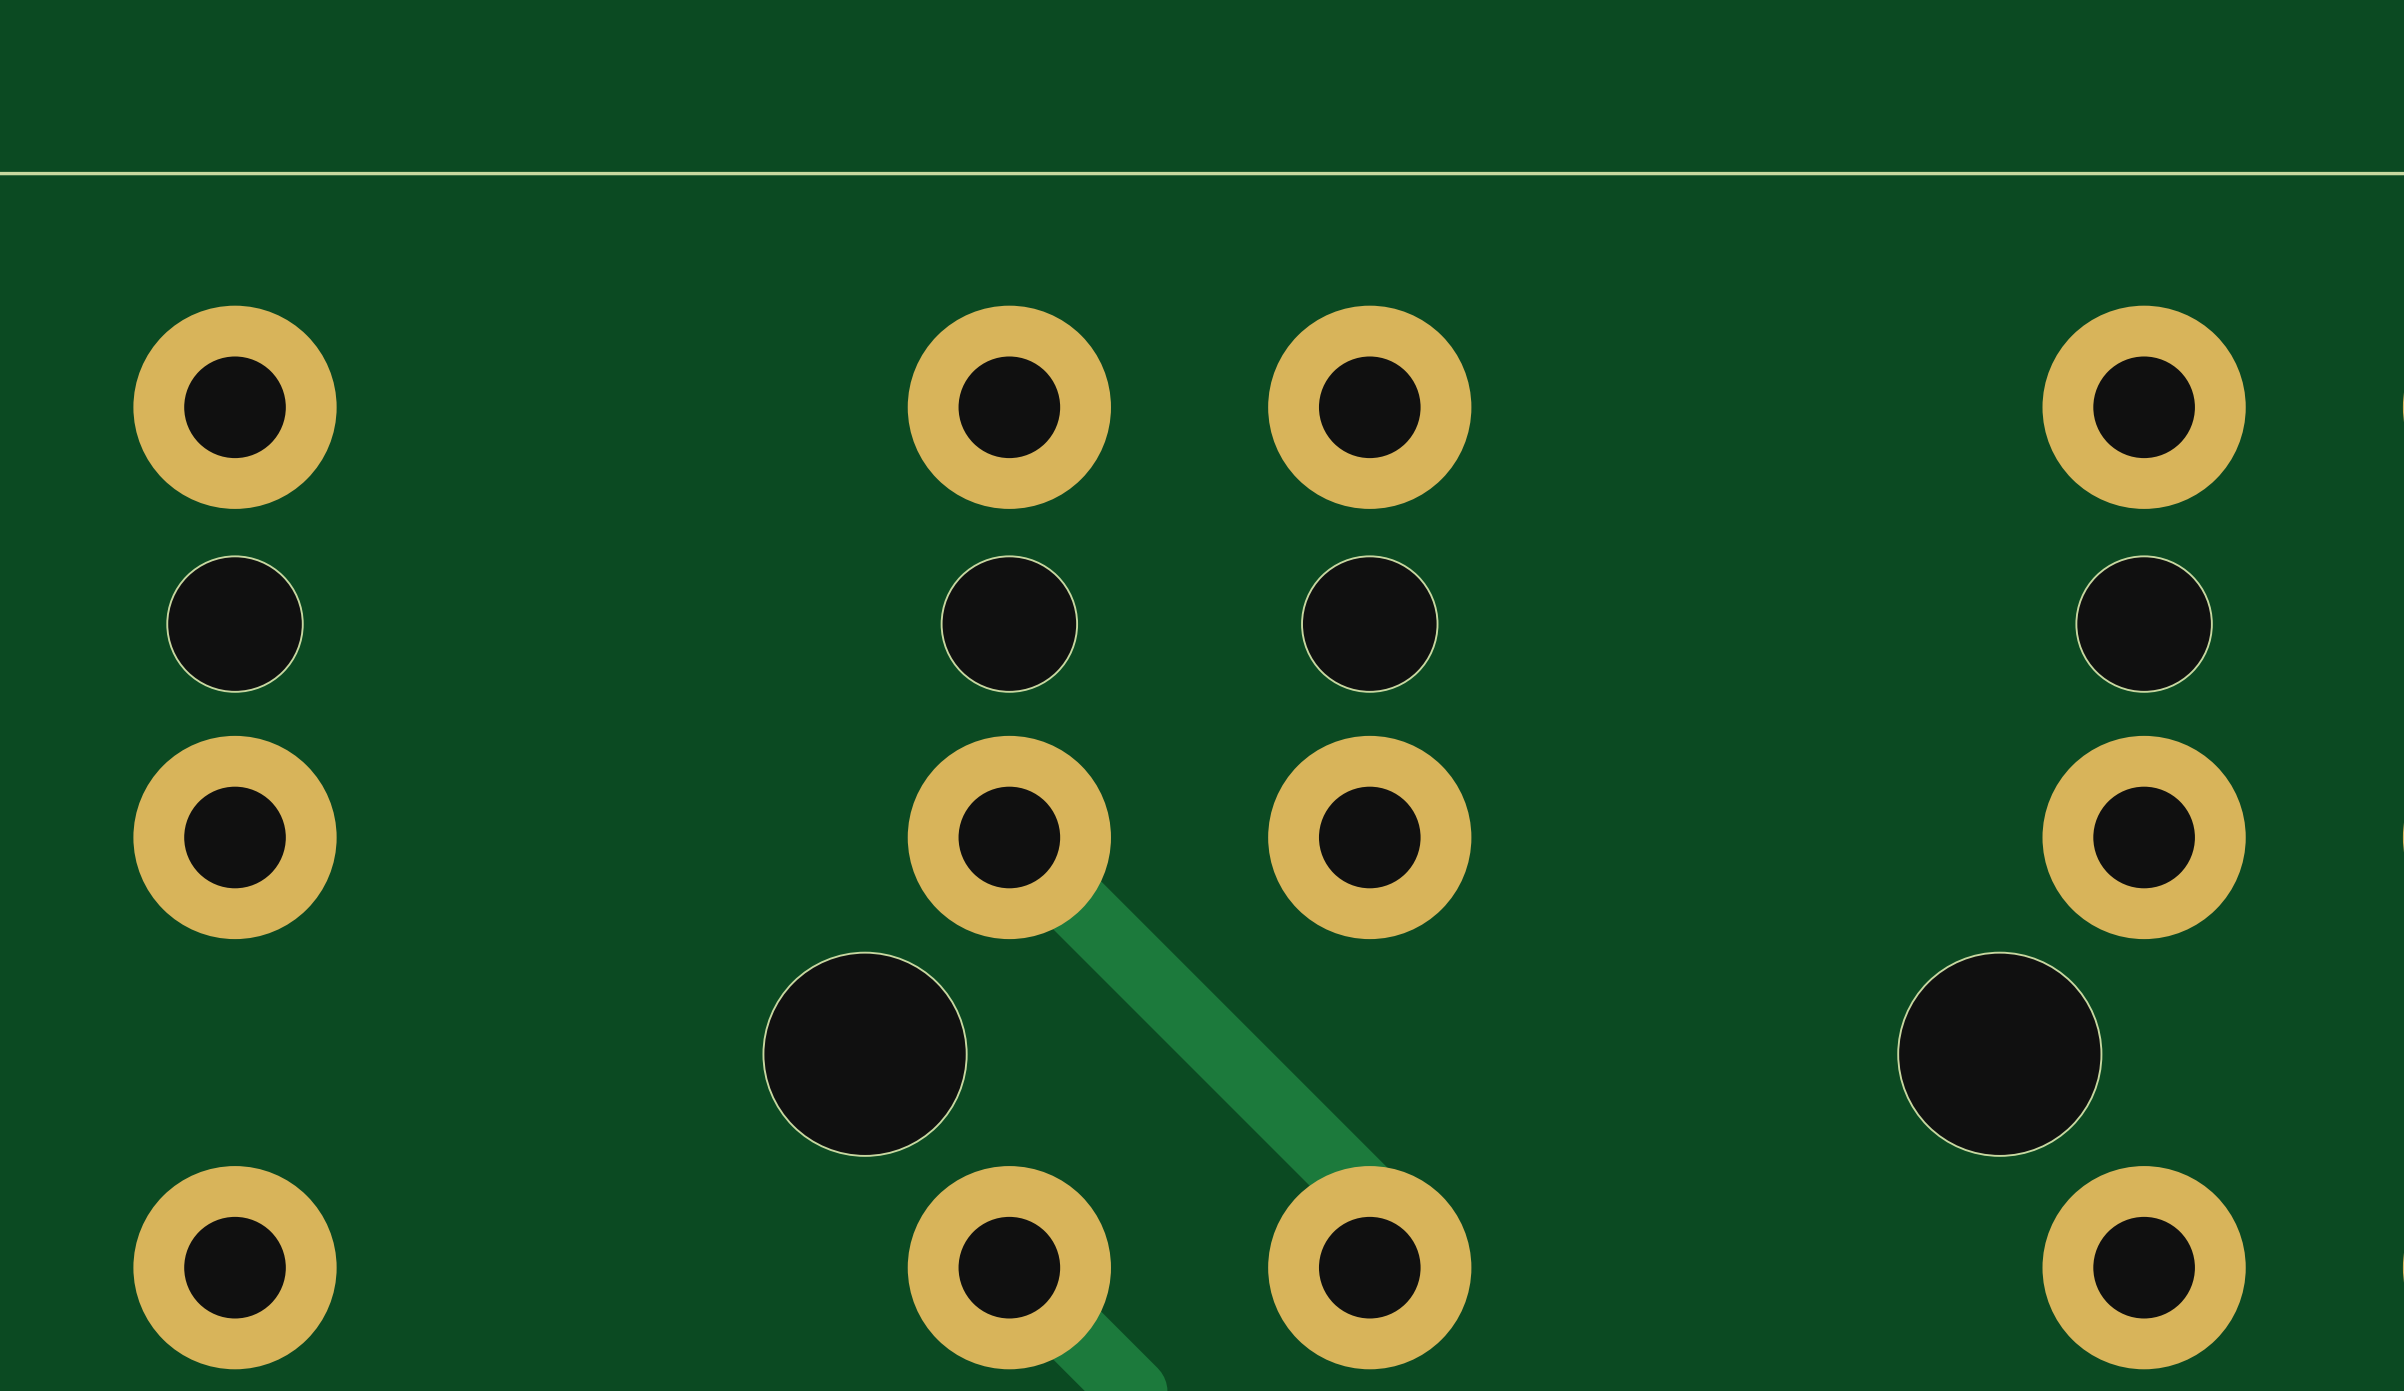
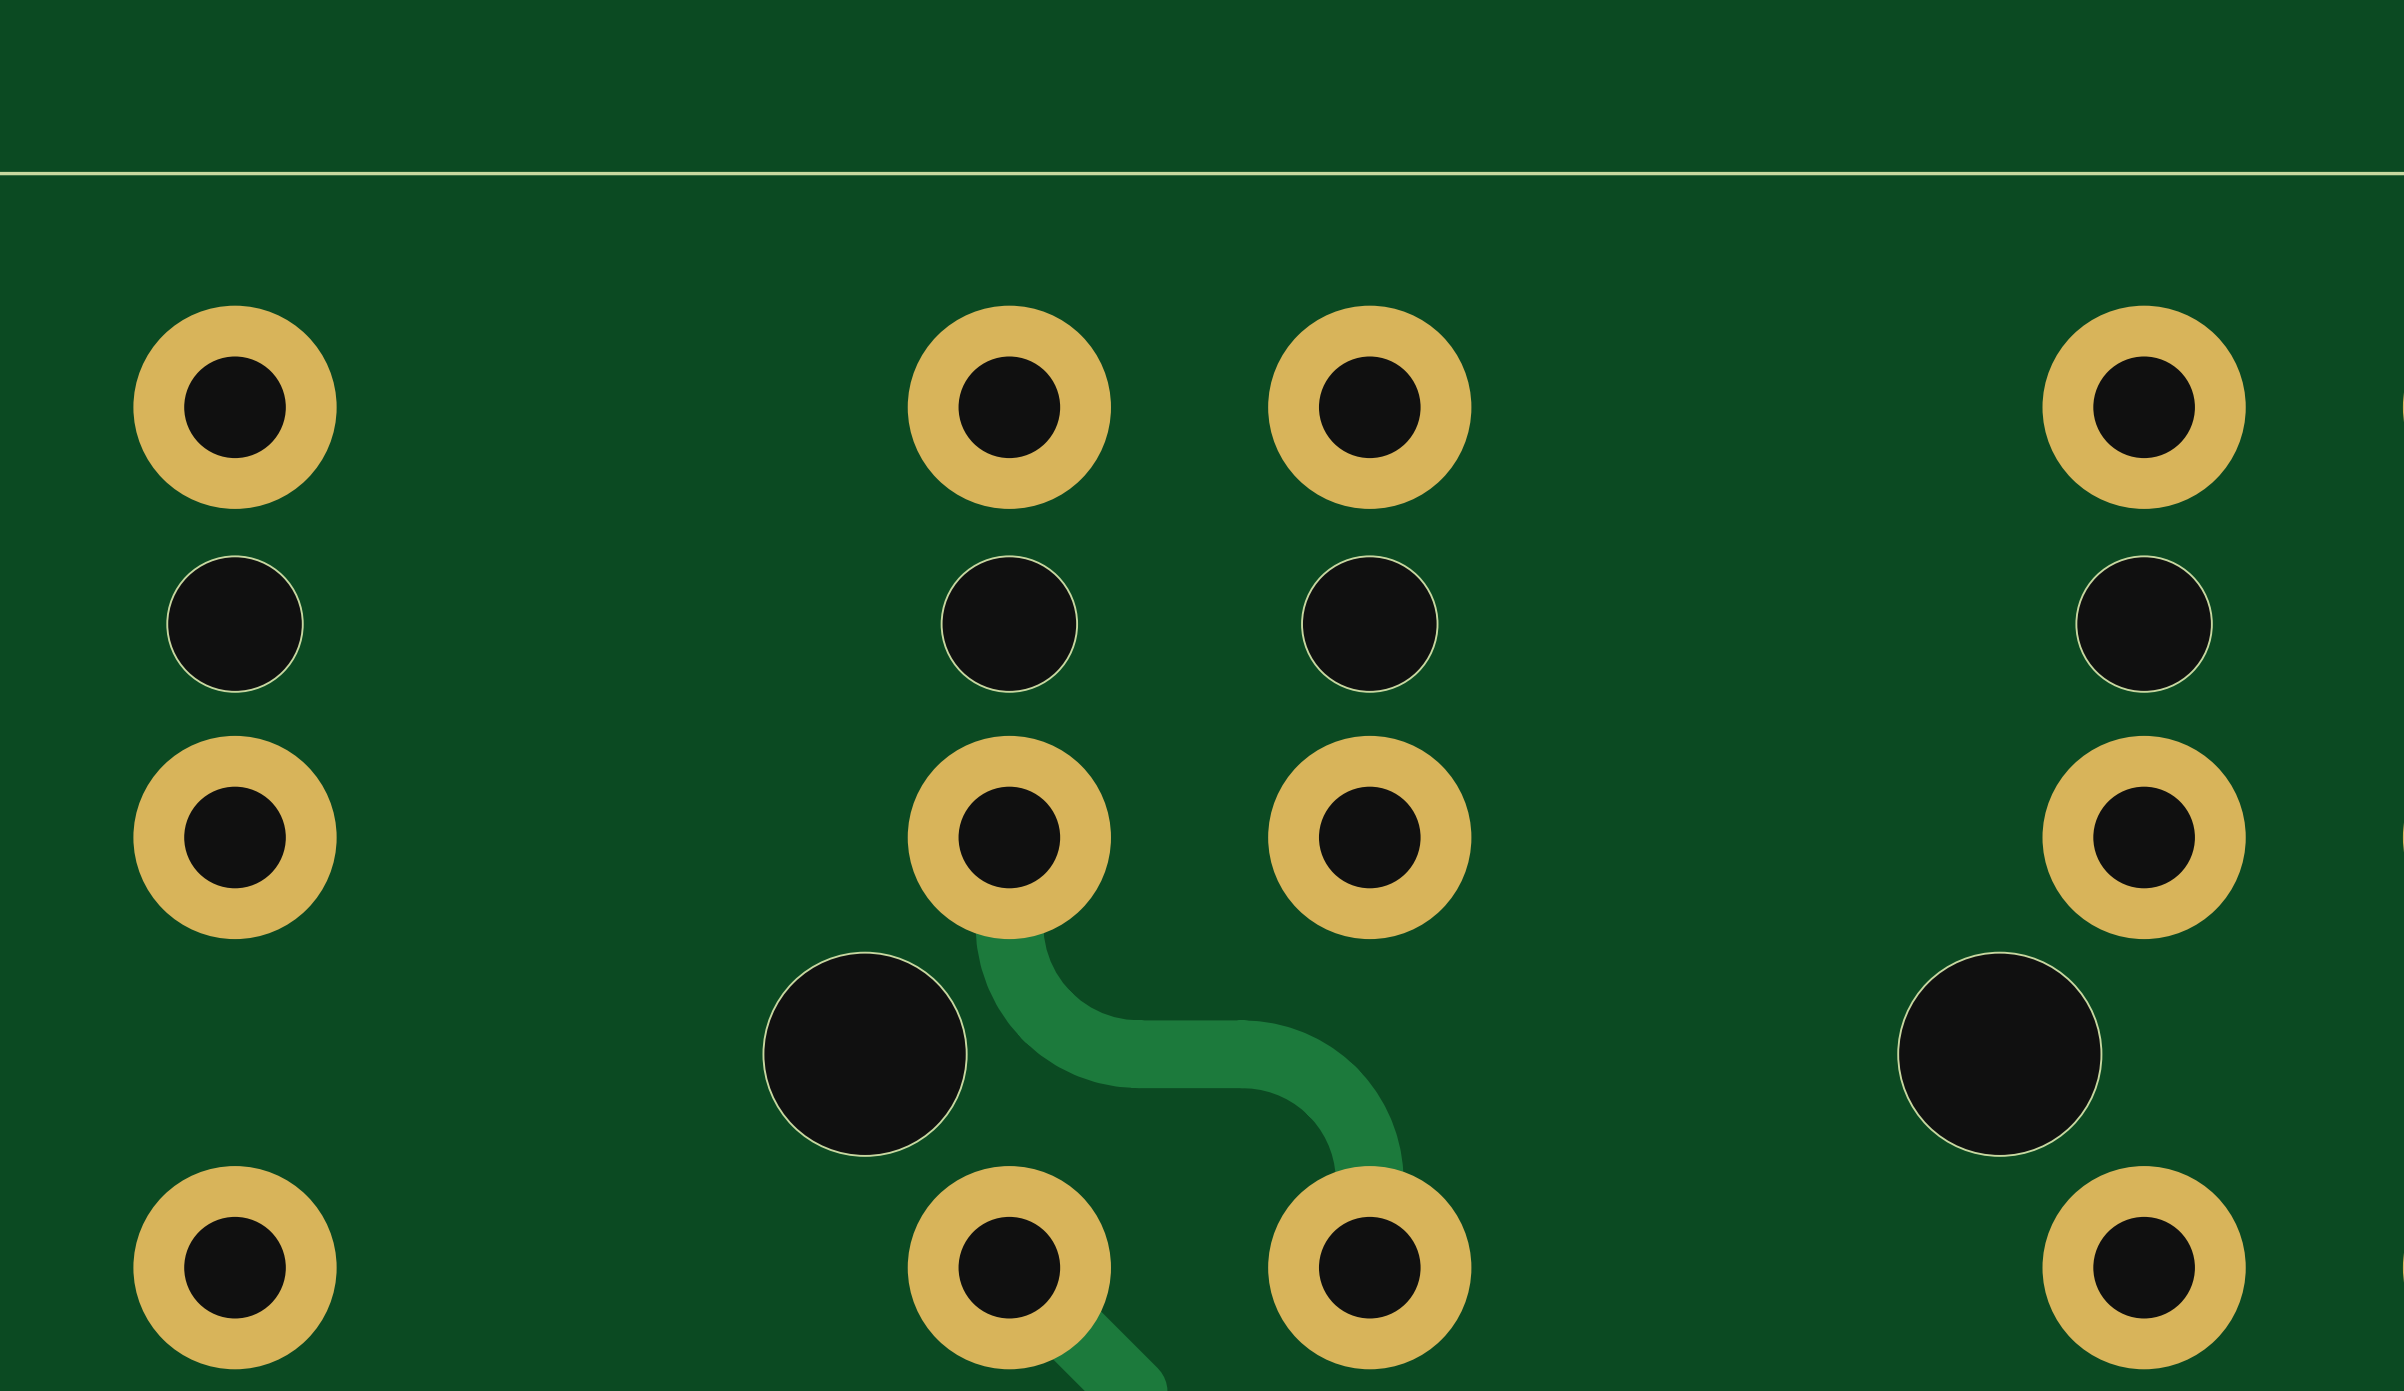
track: (1009, 837) (1369, 1197) -> (1002, 837) (1009, 837) (1009, 924) (1013, 958) (1026, 989) (1047, 1016) (1074, 1036) (1105, 1049) (1138, 1054) (1255, 1054) (1279, 1059) (1302, 1069) (1332, 1091) (1354, 1121) (1367, 1156) (1369, 1197)

